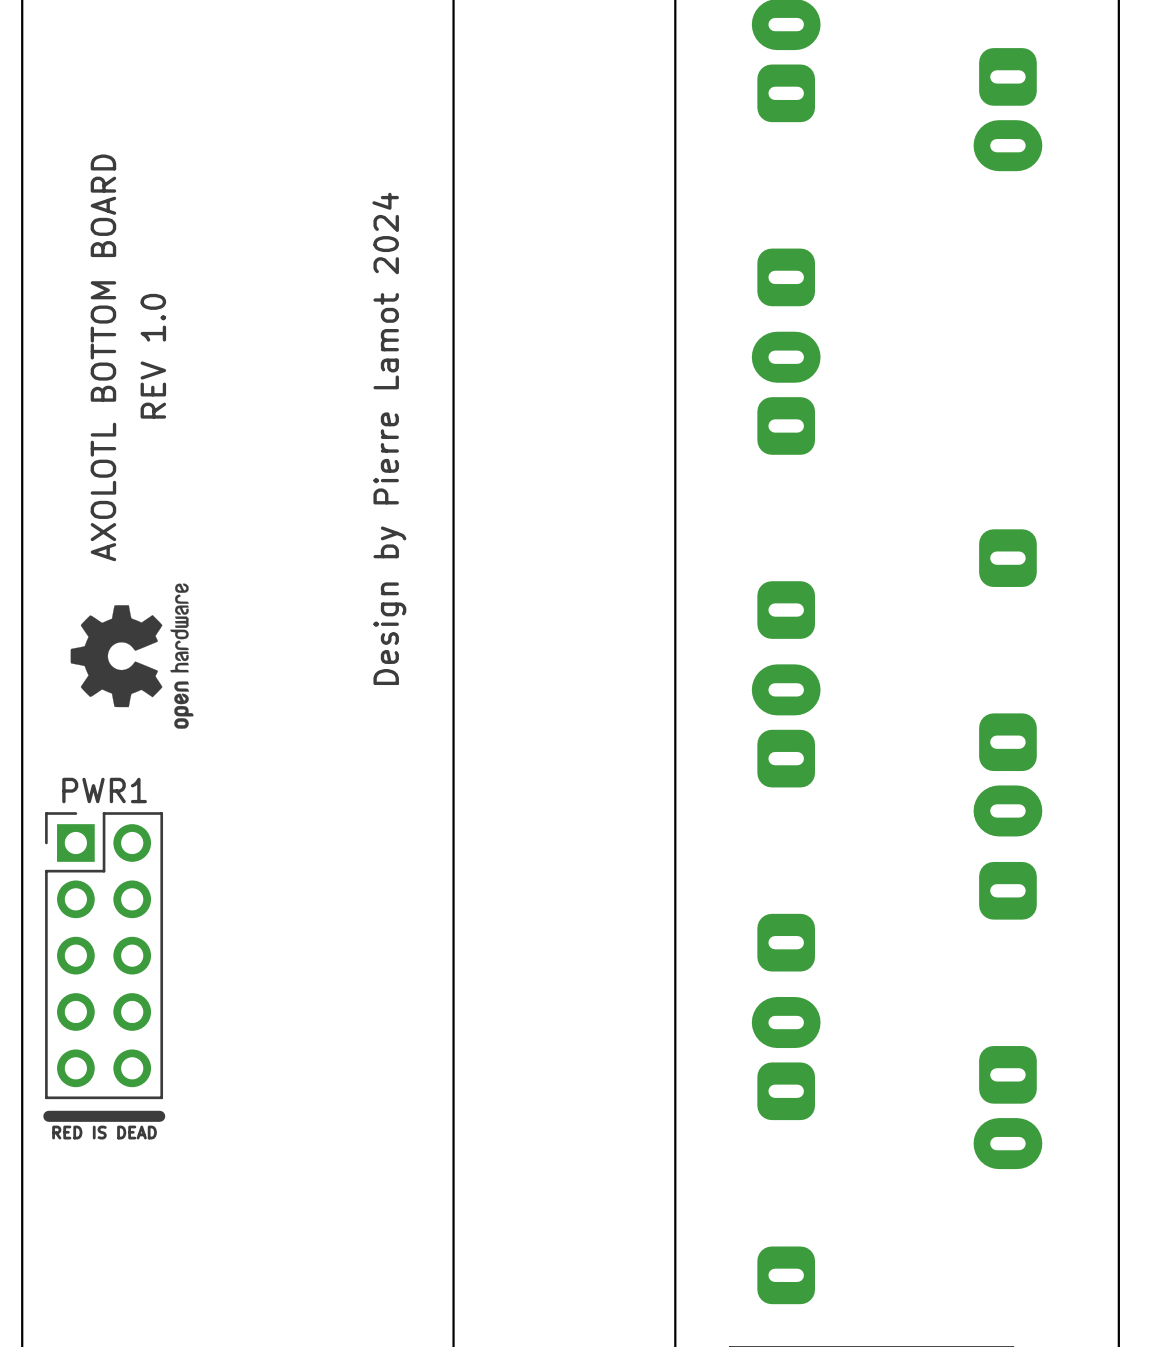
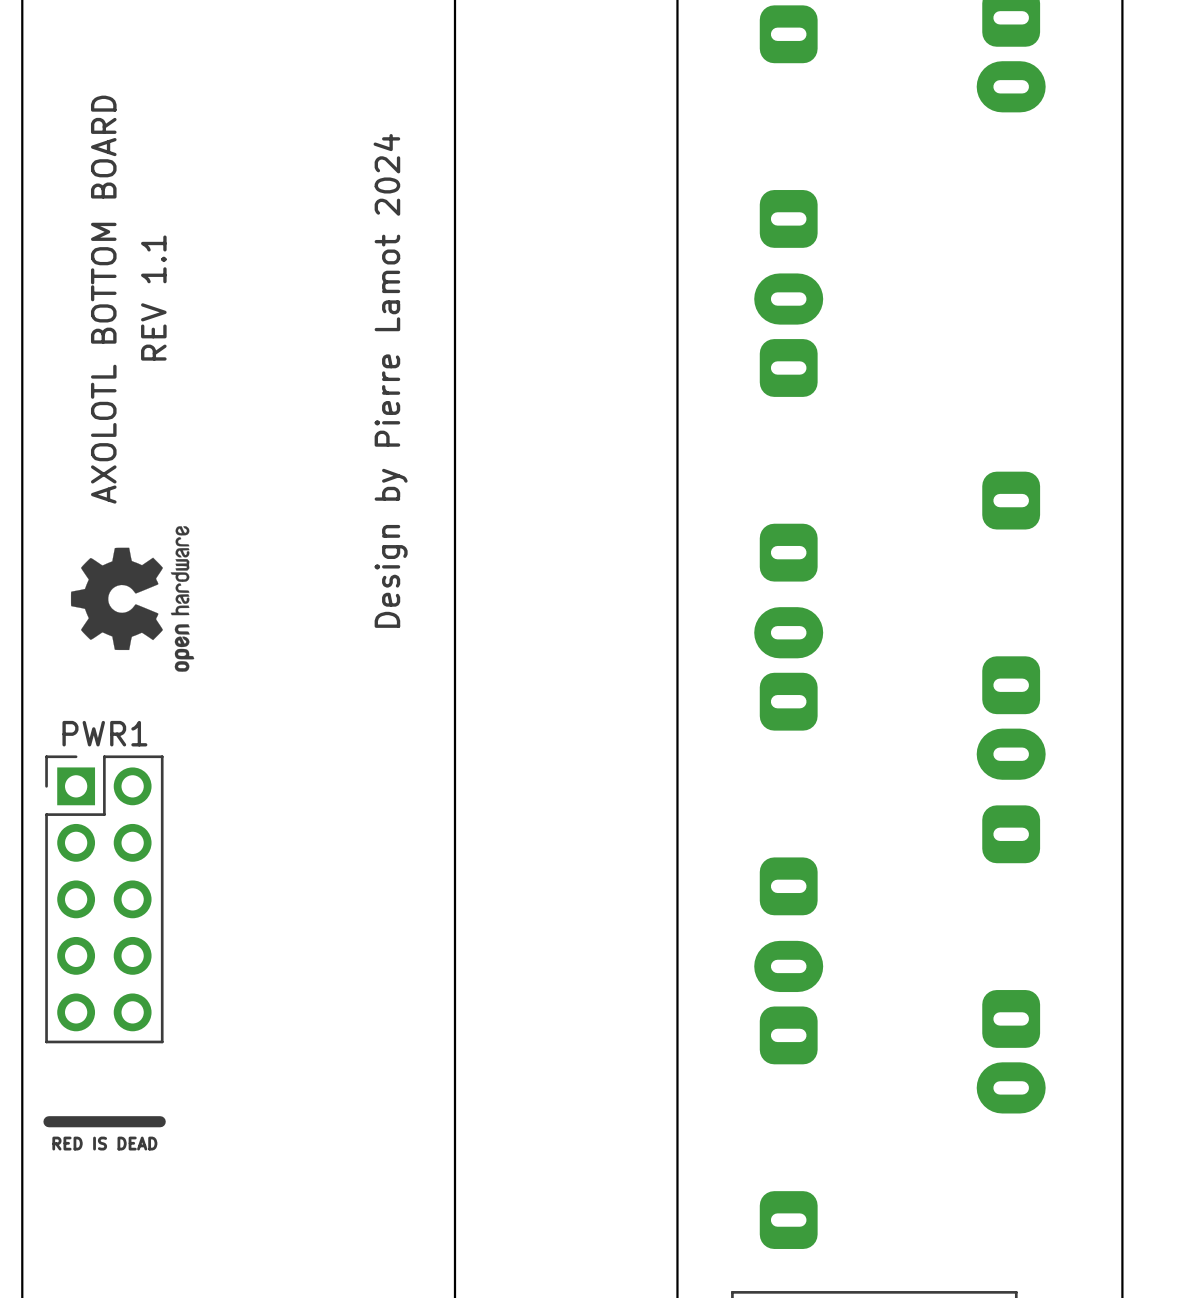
text: REV 1.0 (153, 356) -> REV 1.1 (153, 298)
line: (159, 1116) (48, 1116) -> (160, 1121) (48, 1121)
text position: RED IS DEAD (104, 1132) -> RED IS DEAD (104, 1143)

